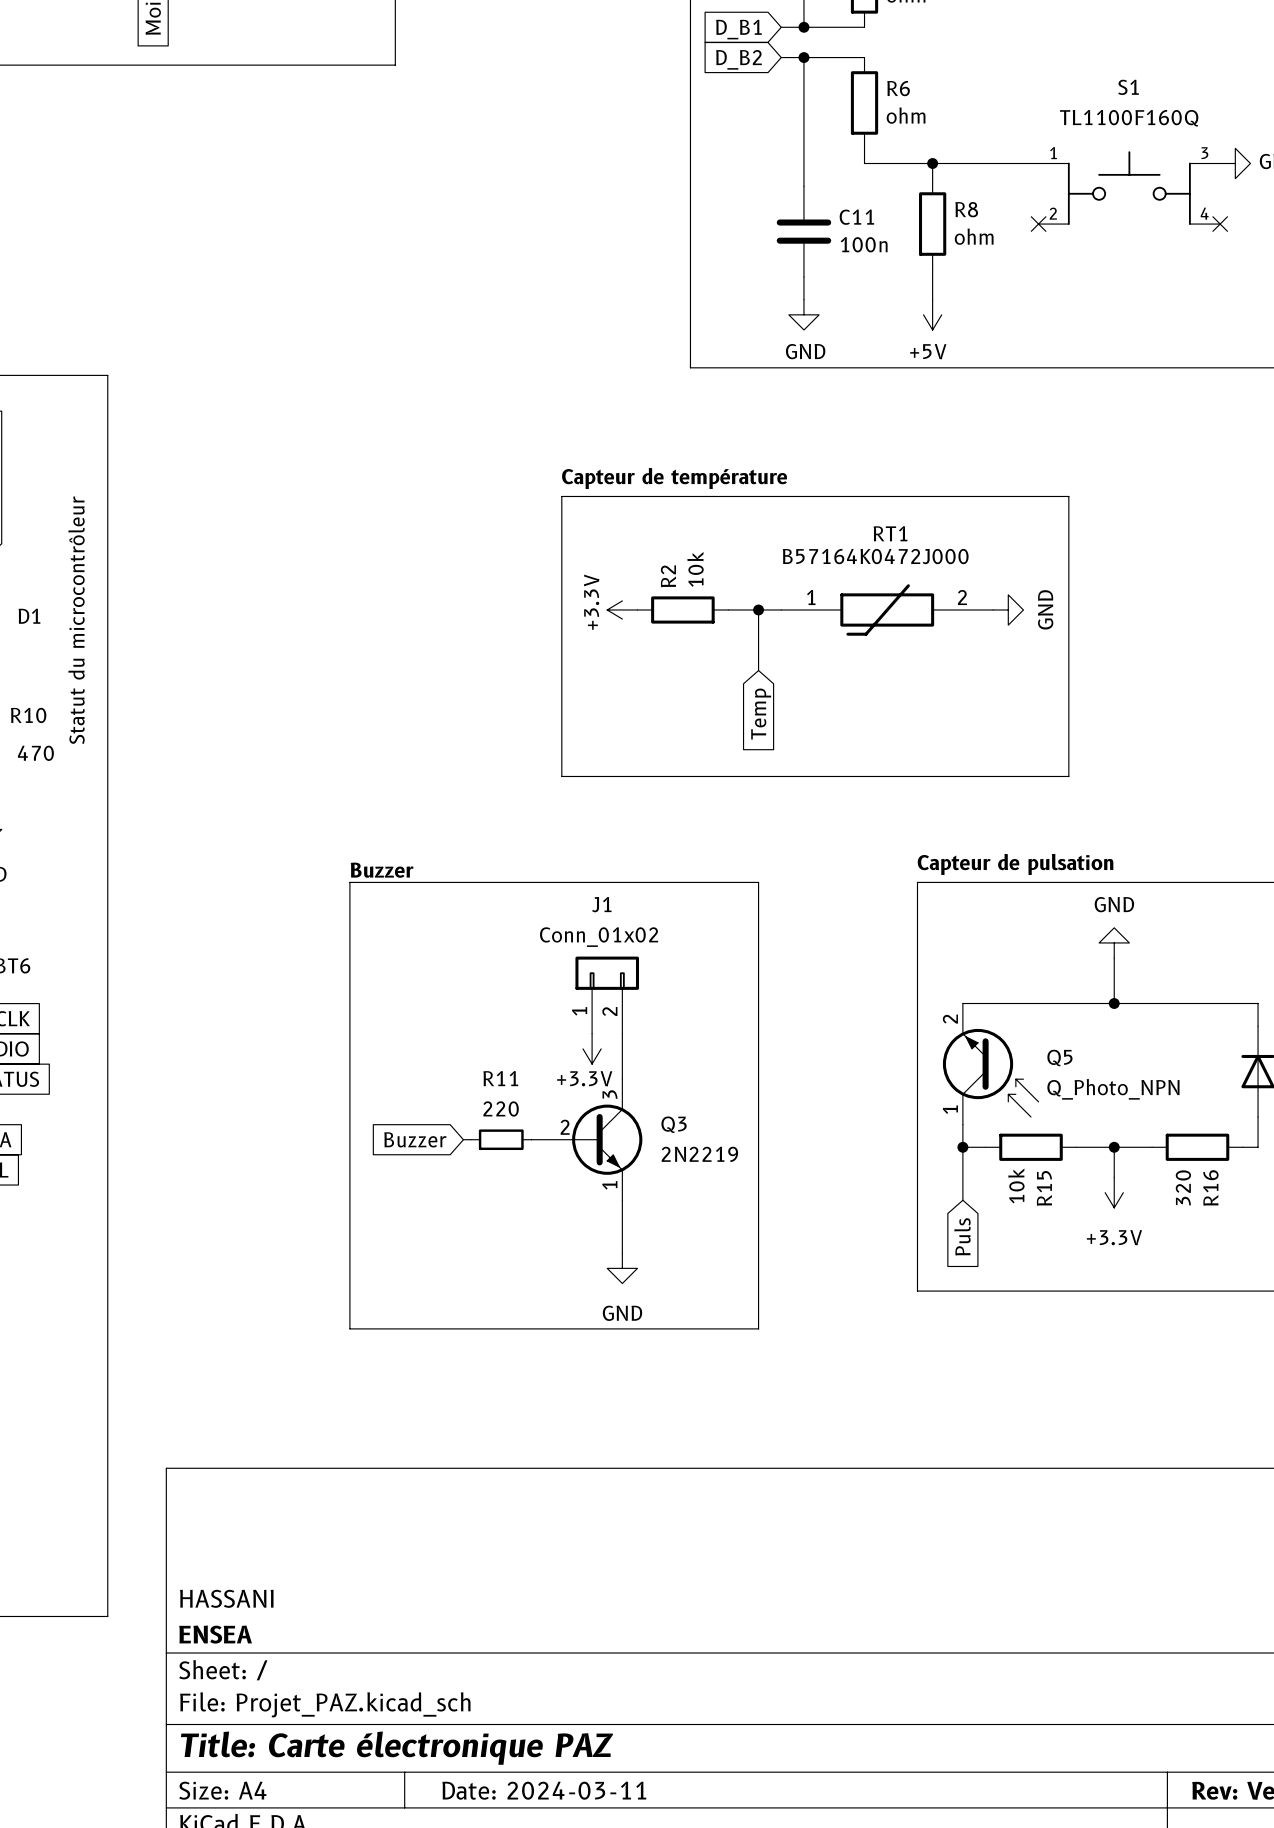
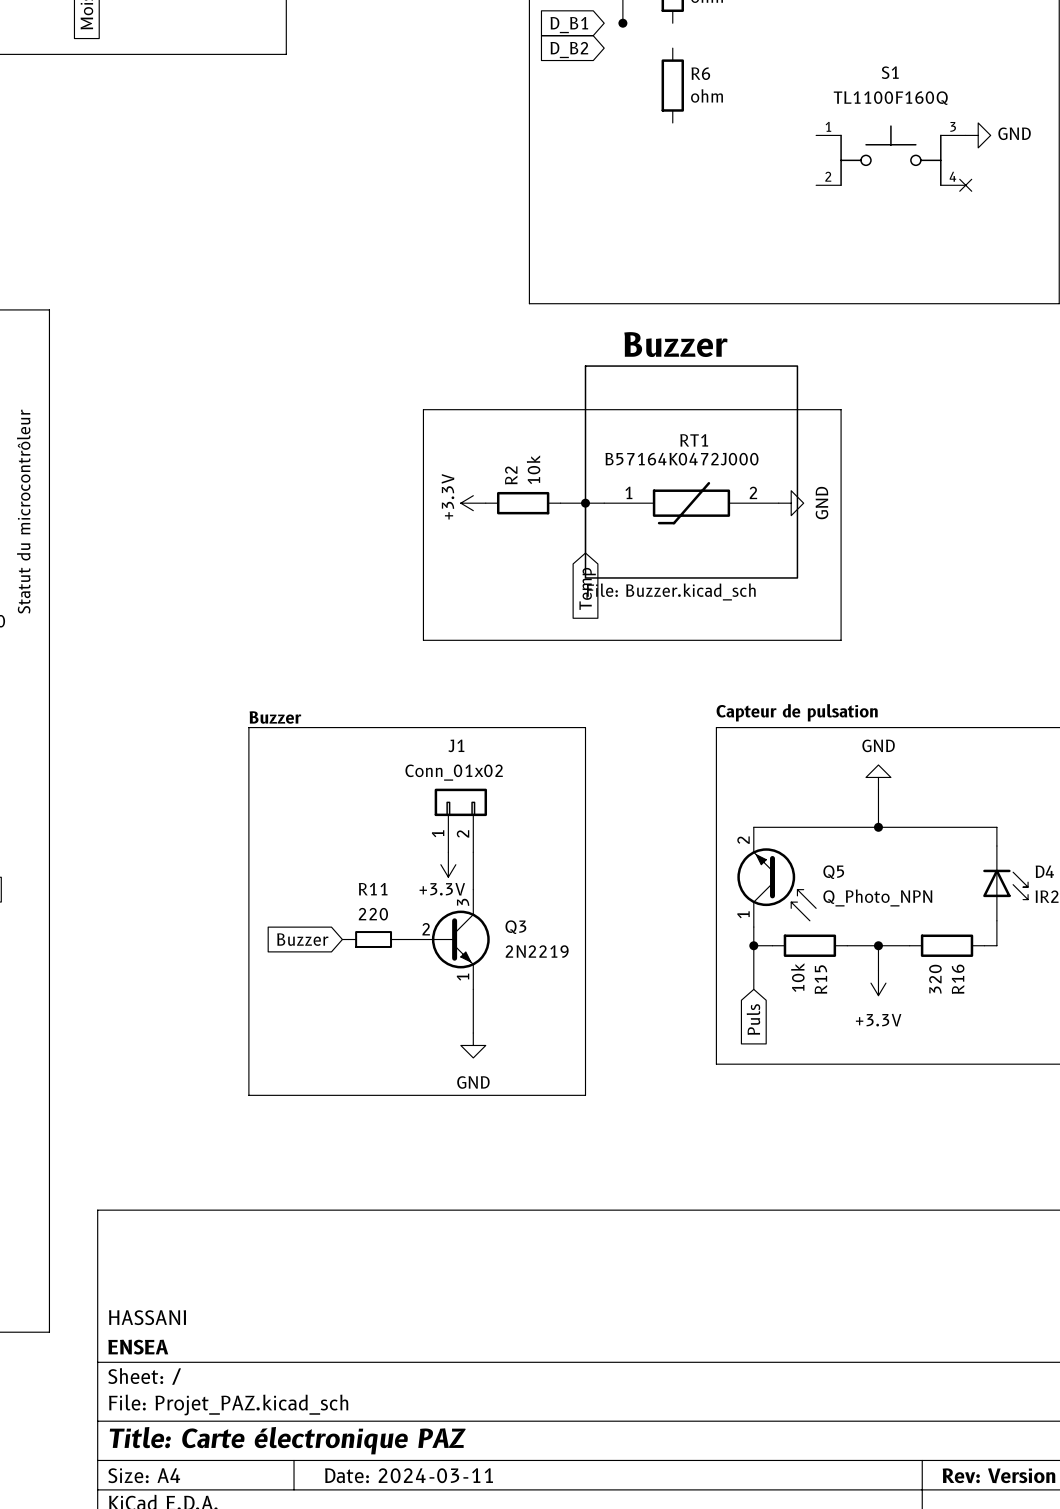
wire: (781, 27) (864, 27) -> none
wire: (781, 57) (864, 57) -> none
wire: (803, 57) (803, 186) -> none
junction: (803, 57) -> none
wire: (864, 148) (864, 163) (1038, 163) -> none
wire: (932, 163) (932, 178) -> none
junction: (932, 163) -> none
R8: ohm (932, 224) -> none
no-connect mark: (1038, 224) -> none
C11: 100n (803, 231) -> none
wire: (932, 269) (932, 299) -> none
wire: (803, 277) (803, 299) -> none
power symbol: GND (803, 314) -> none
power symbol: +5V (932, 314) -> none
text: Capteur de température (674, 478) -> none
sheet Buzzer: none -> File: Buzzer.kicad_sch (691, 472)

